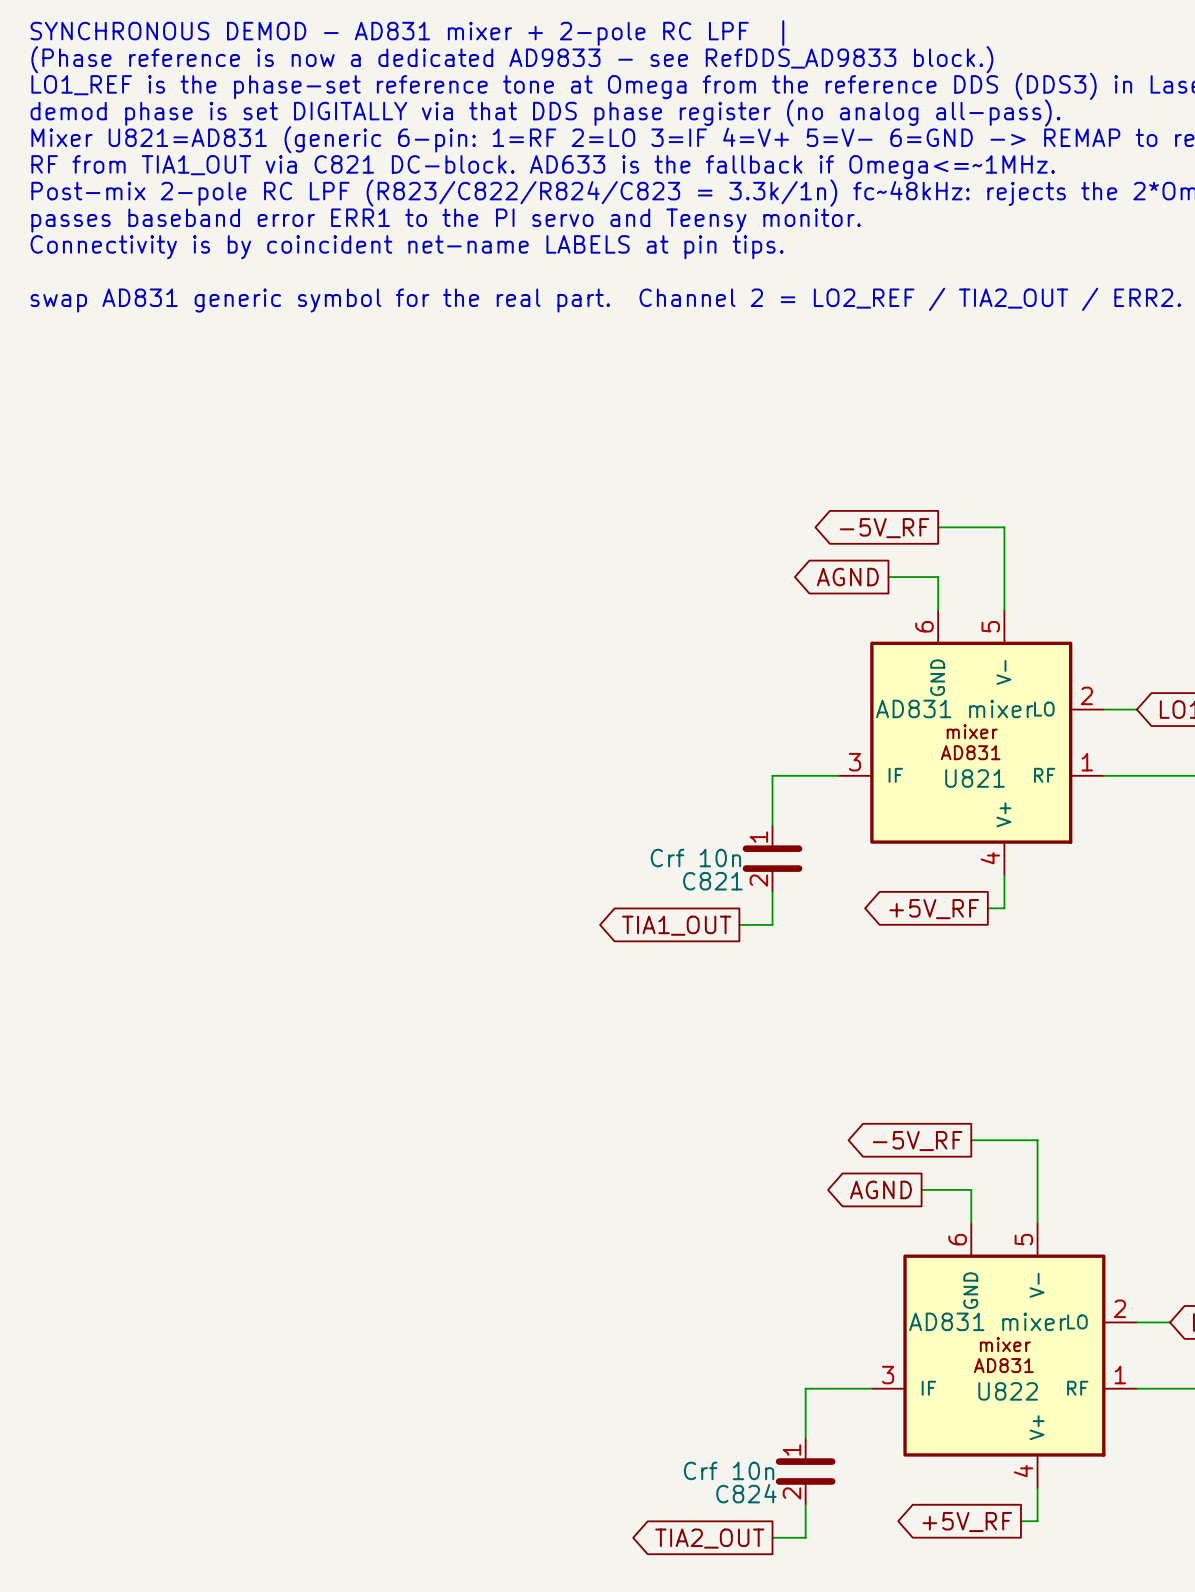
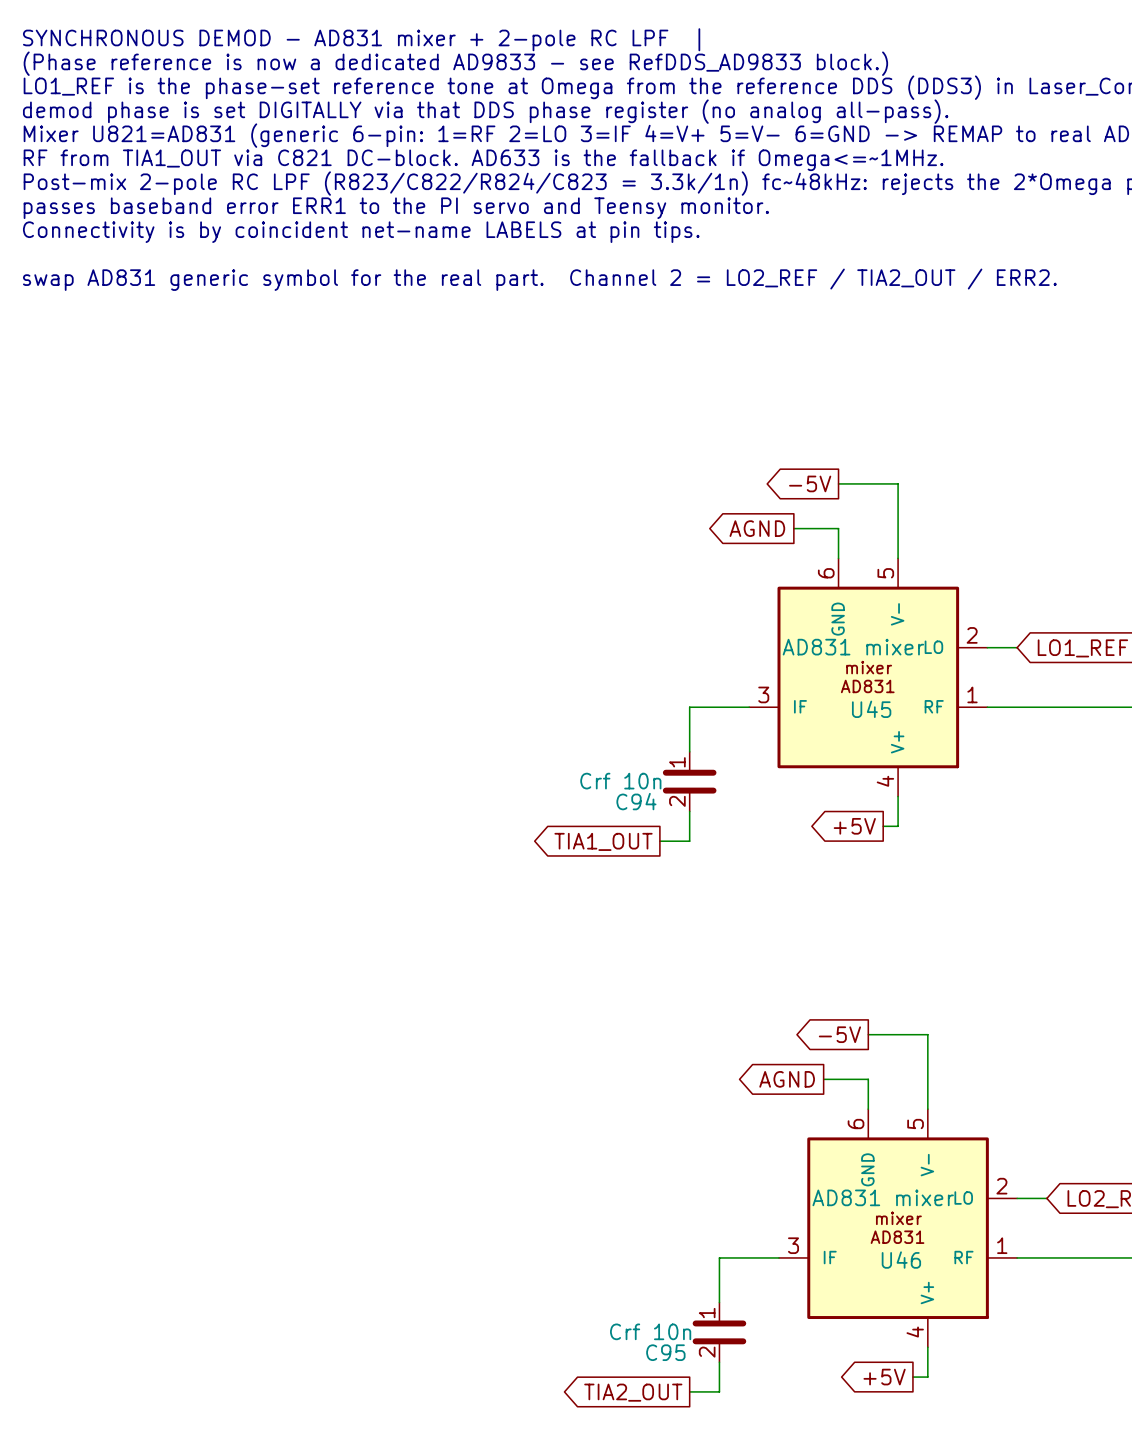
global label: -5V_RF (884, 528) -> -5V (810, 483)
U821 name: U821 (974, 778) -> U45 (871, 709)
C821 name: C821 (712, 881) -> C94 (636, 801)
global label: +5V_RF (934, 909) -> +5V (854, 826)
global label: -5V_RF (917, 1141) -> -5V (839, 1034)
U822 name: U822 (1008, 1391) -> U46 (901, 1260)
C824 name: C824 (746, 1493) -> C95 (665, 1352)
global label: +5V_RF (967, 1522) -> +5V (884, 1377)

